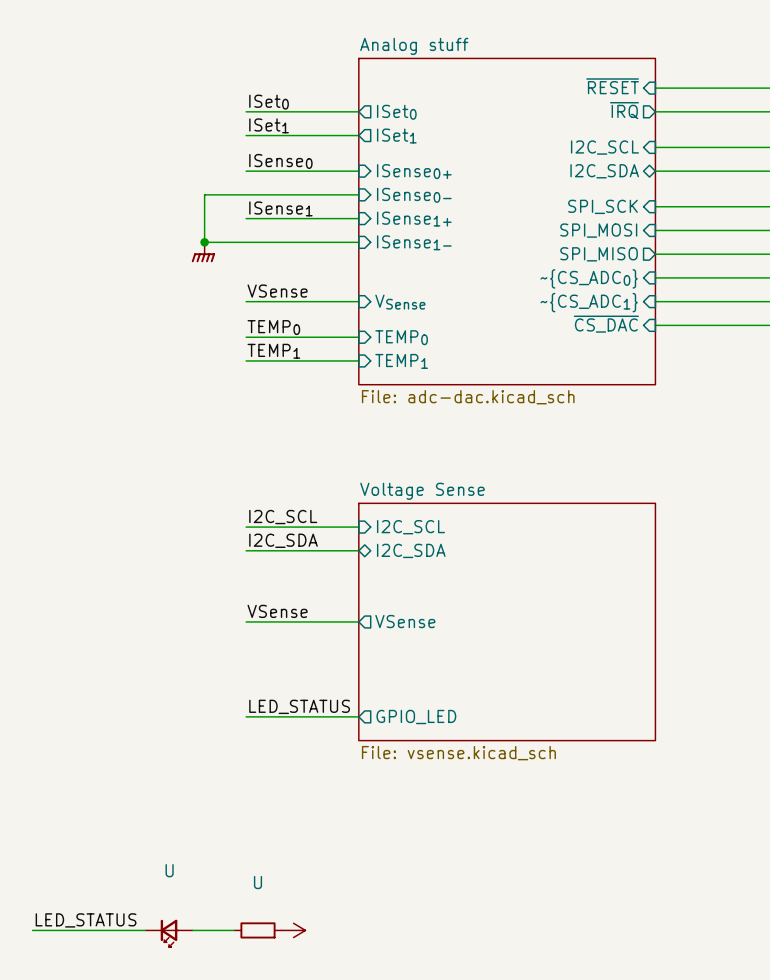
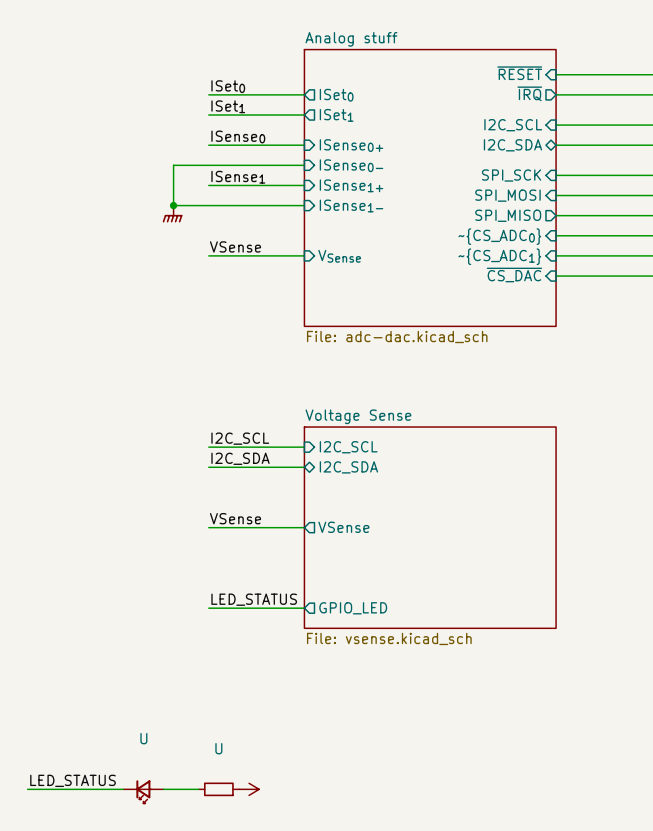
label: TEMP0 (273, 327) -> none
wire: (246, 337) (358, 337) -> none
sheet pin: TEMP0 (401, 337) -> none
label: TEMP1 (273, 351) -> none
wire: (246, 360) (358, 360) -> none
sheet pin: TEMP1 (401, 361) -> none

